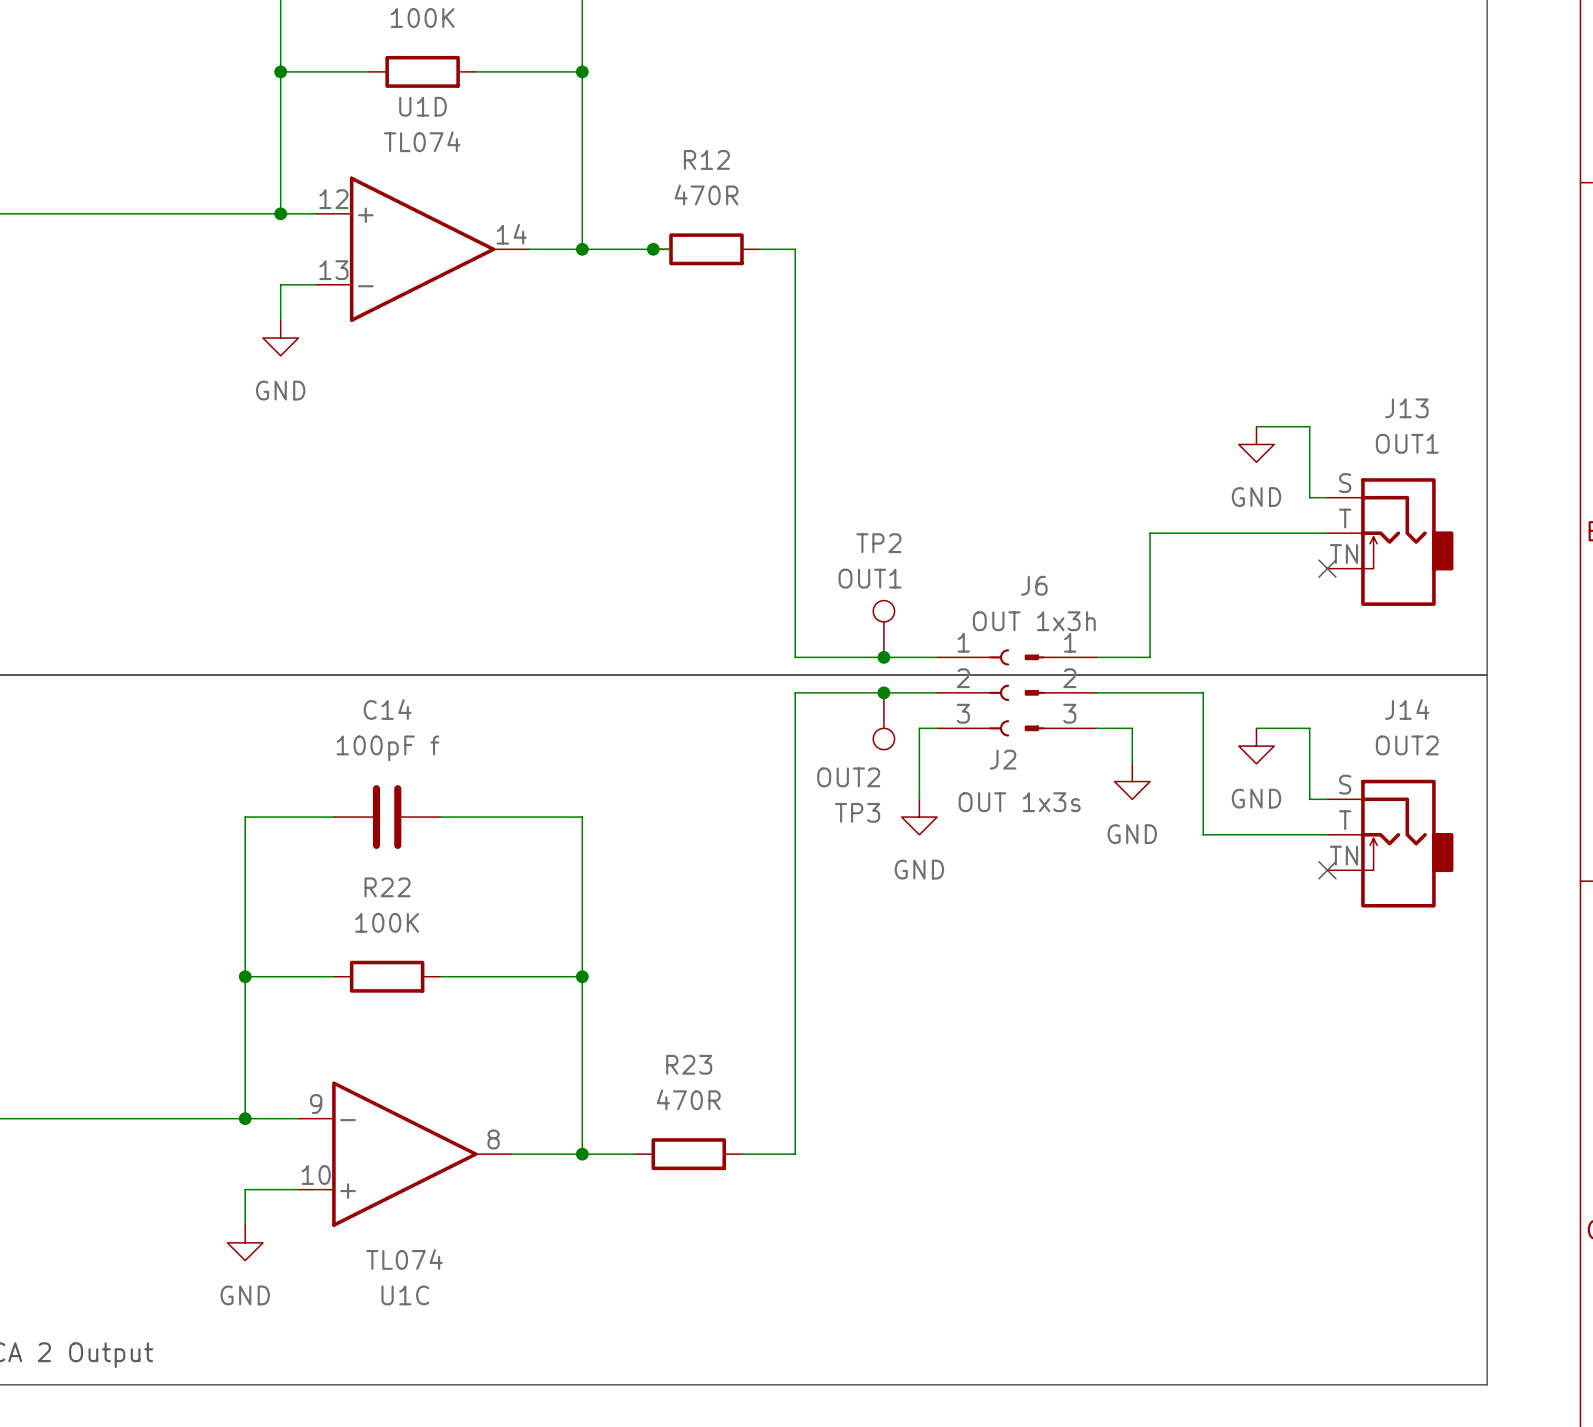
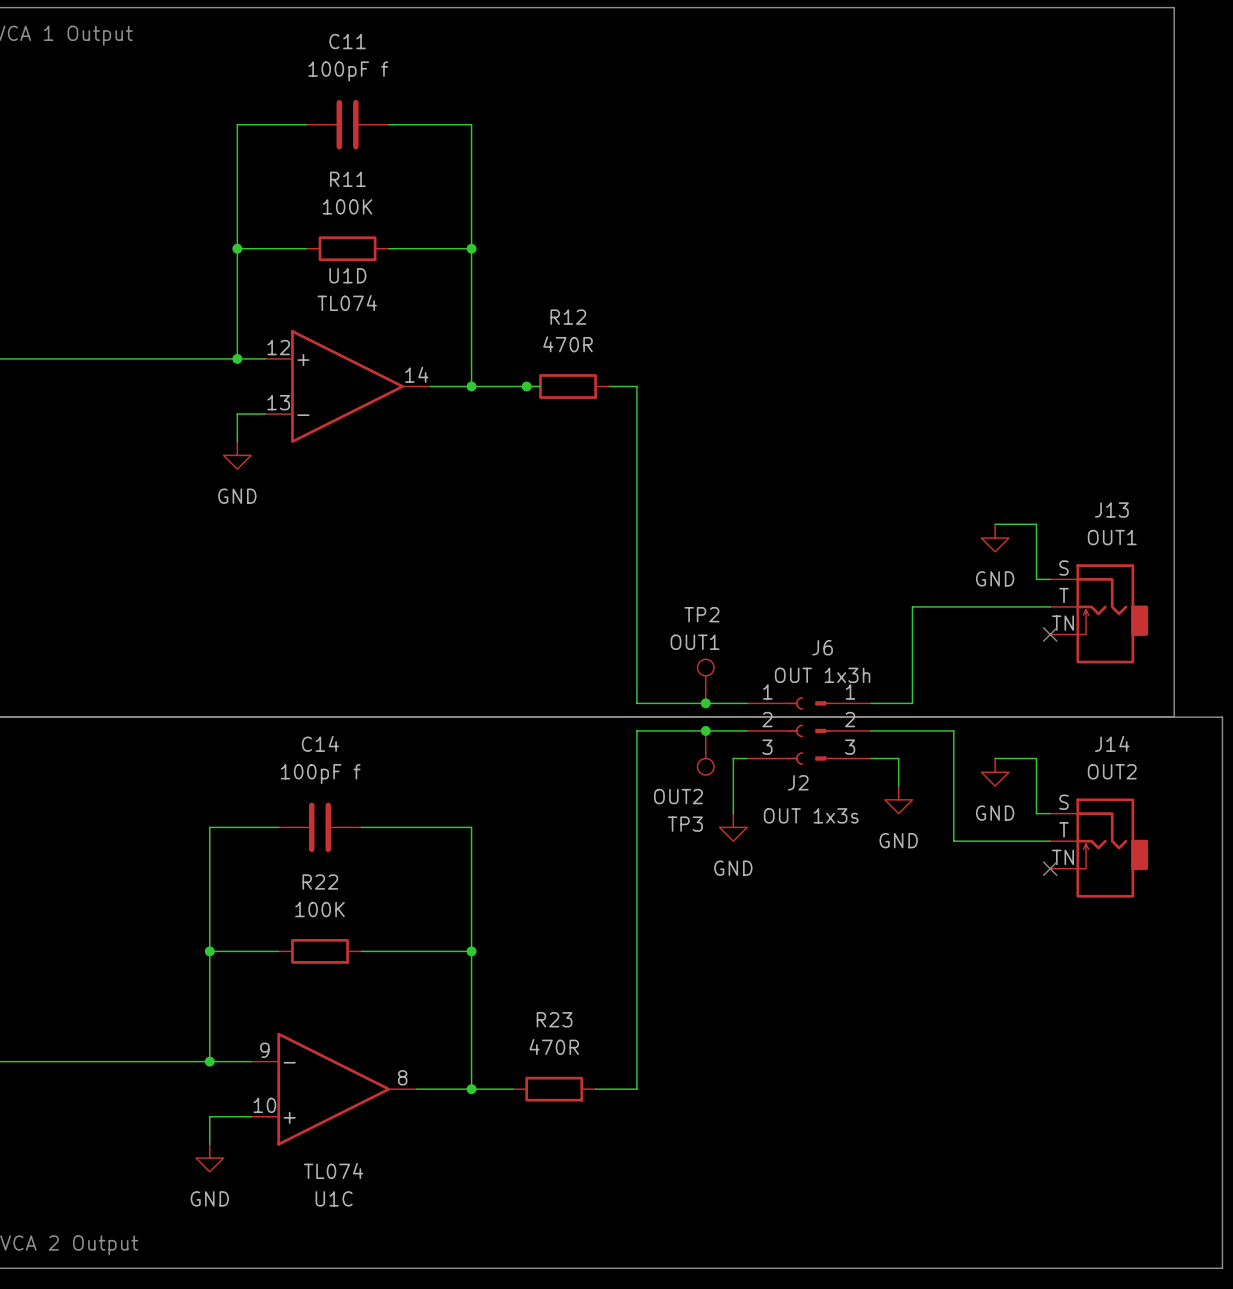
line: (1487, 675) (1487, 1384) -> (1174, 717) (1222, 717) (1222, 1268) (1174, 1268)

